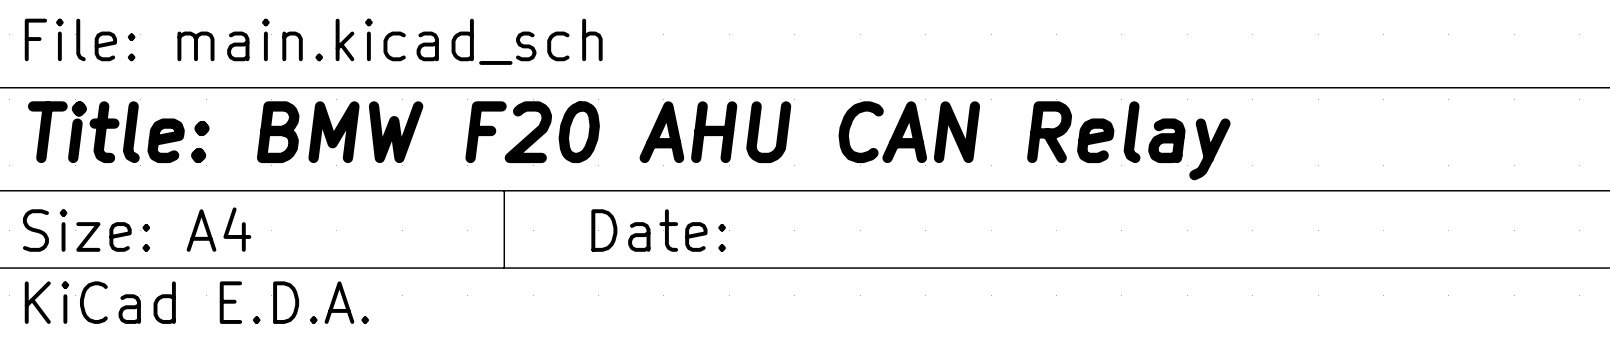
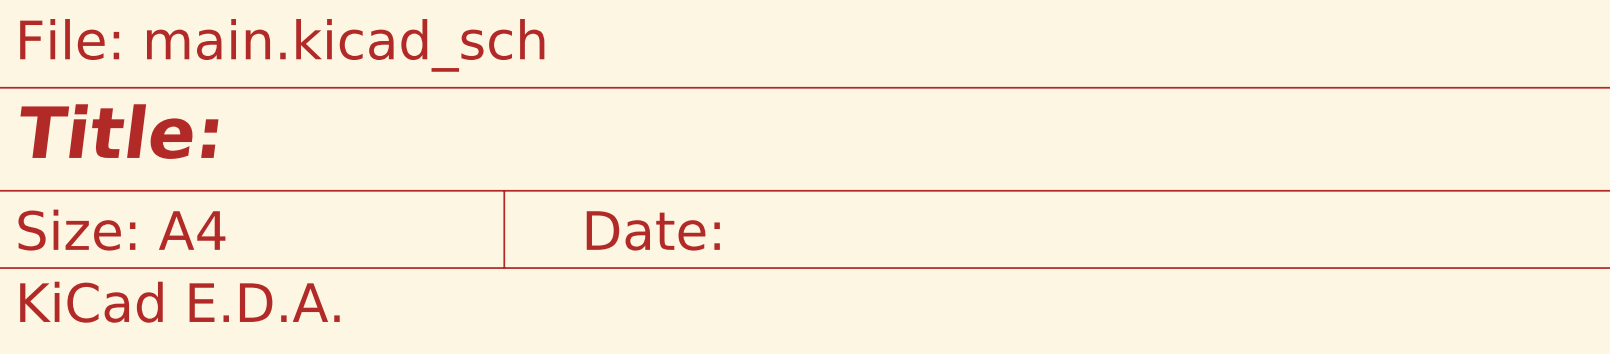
title block: Title: BMW F20 AHU CAN Relay (629, 140) -> Title: (119, 131)

